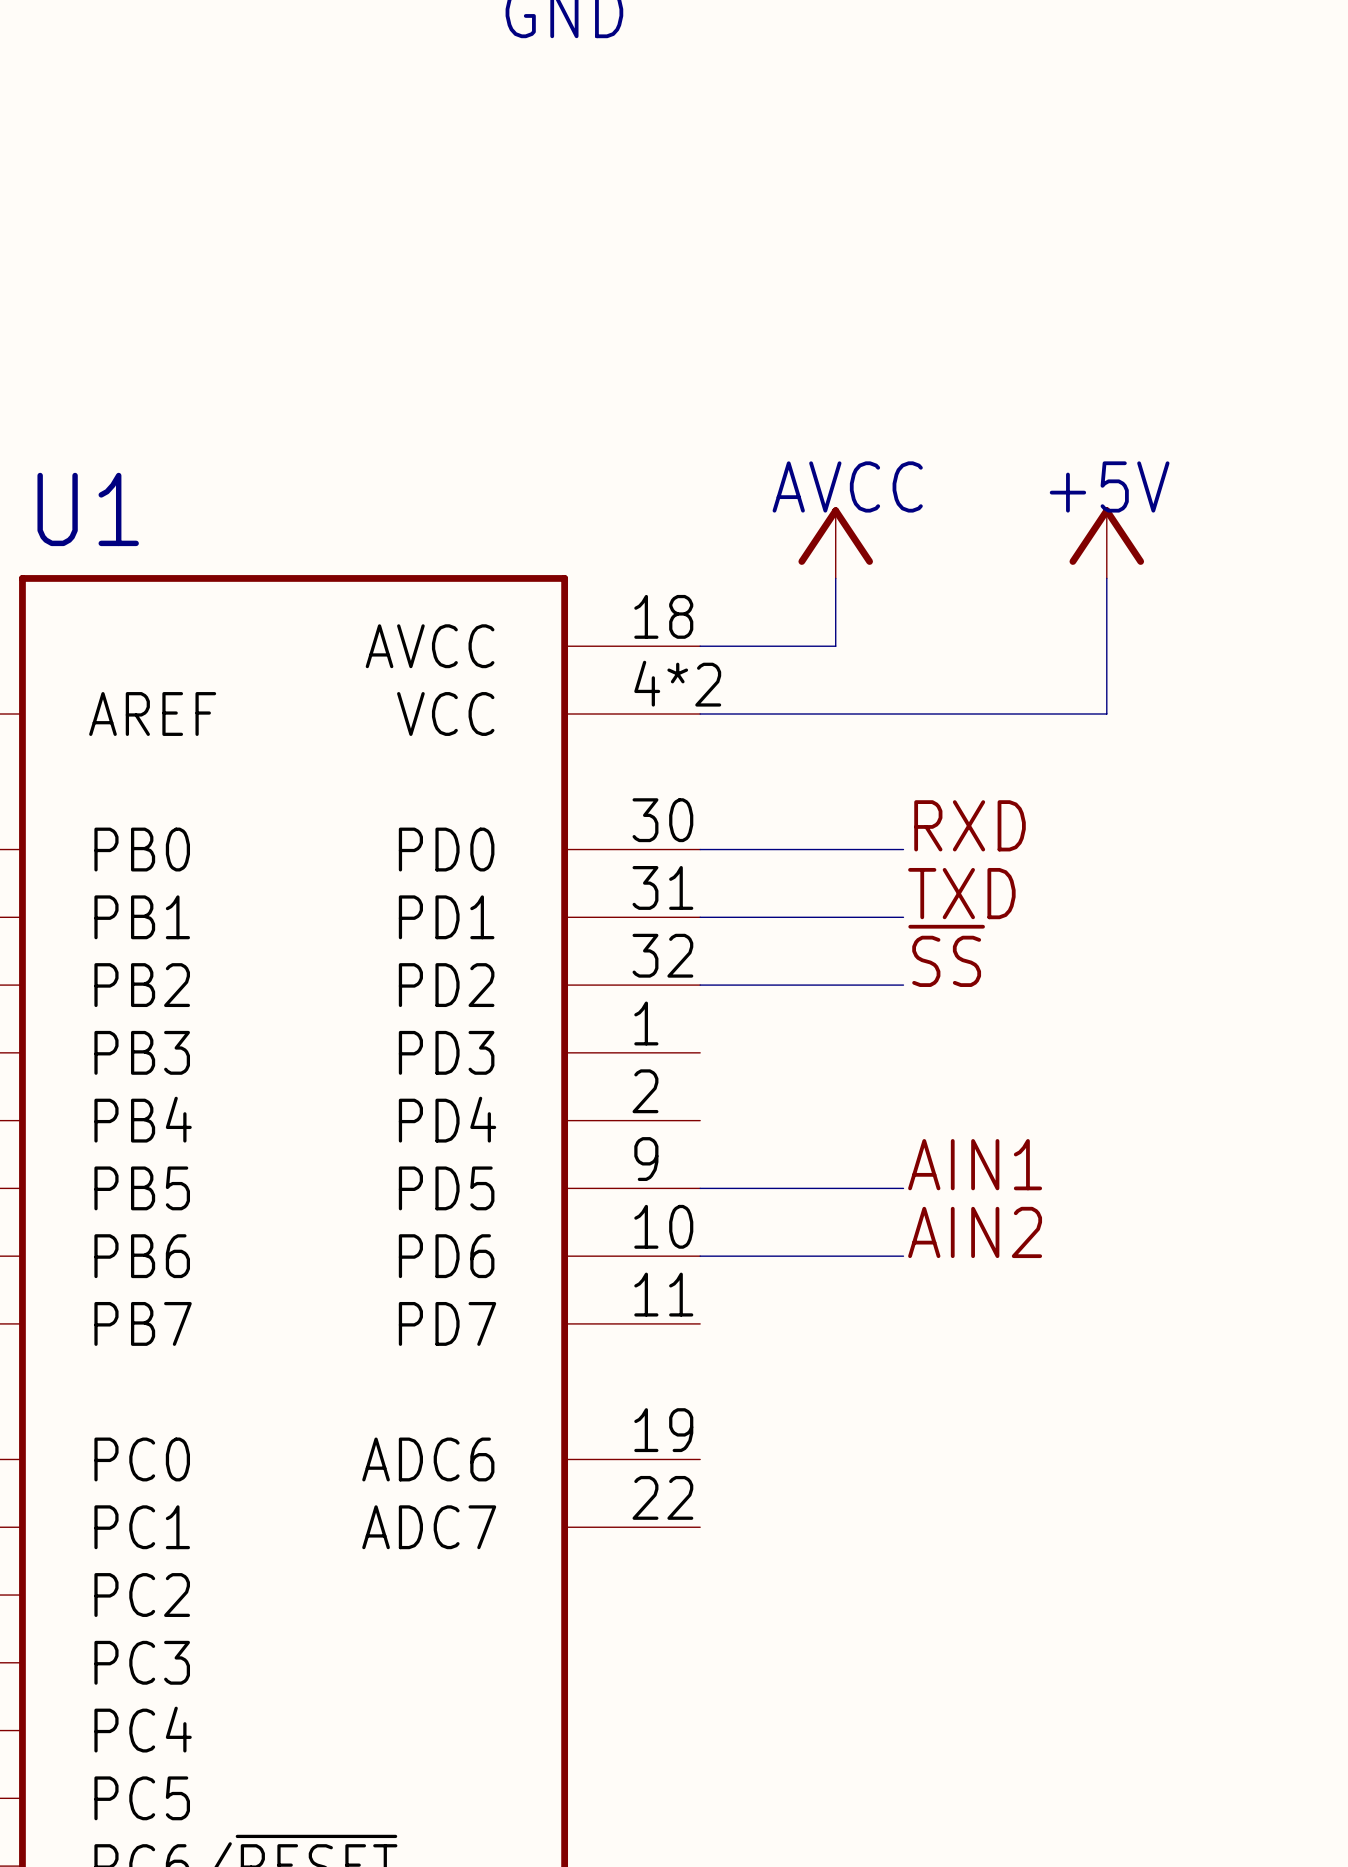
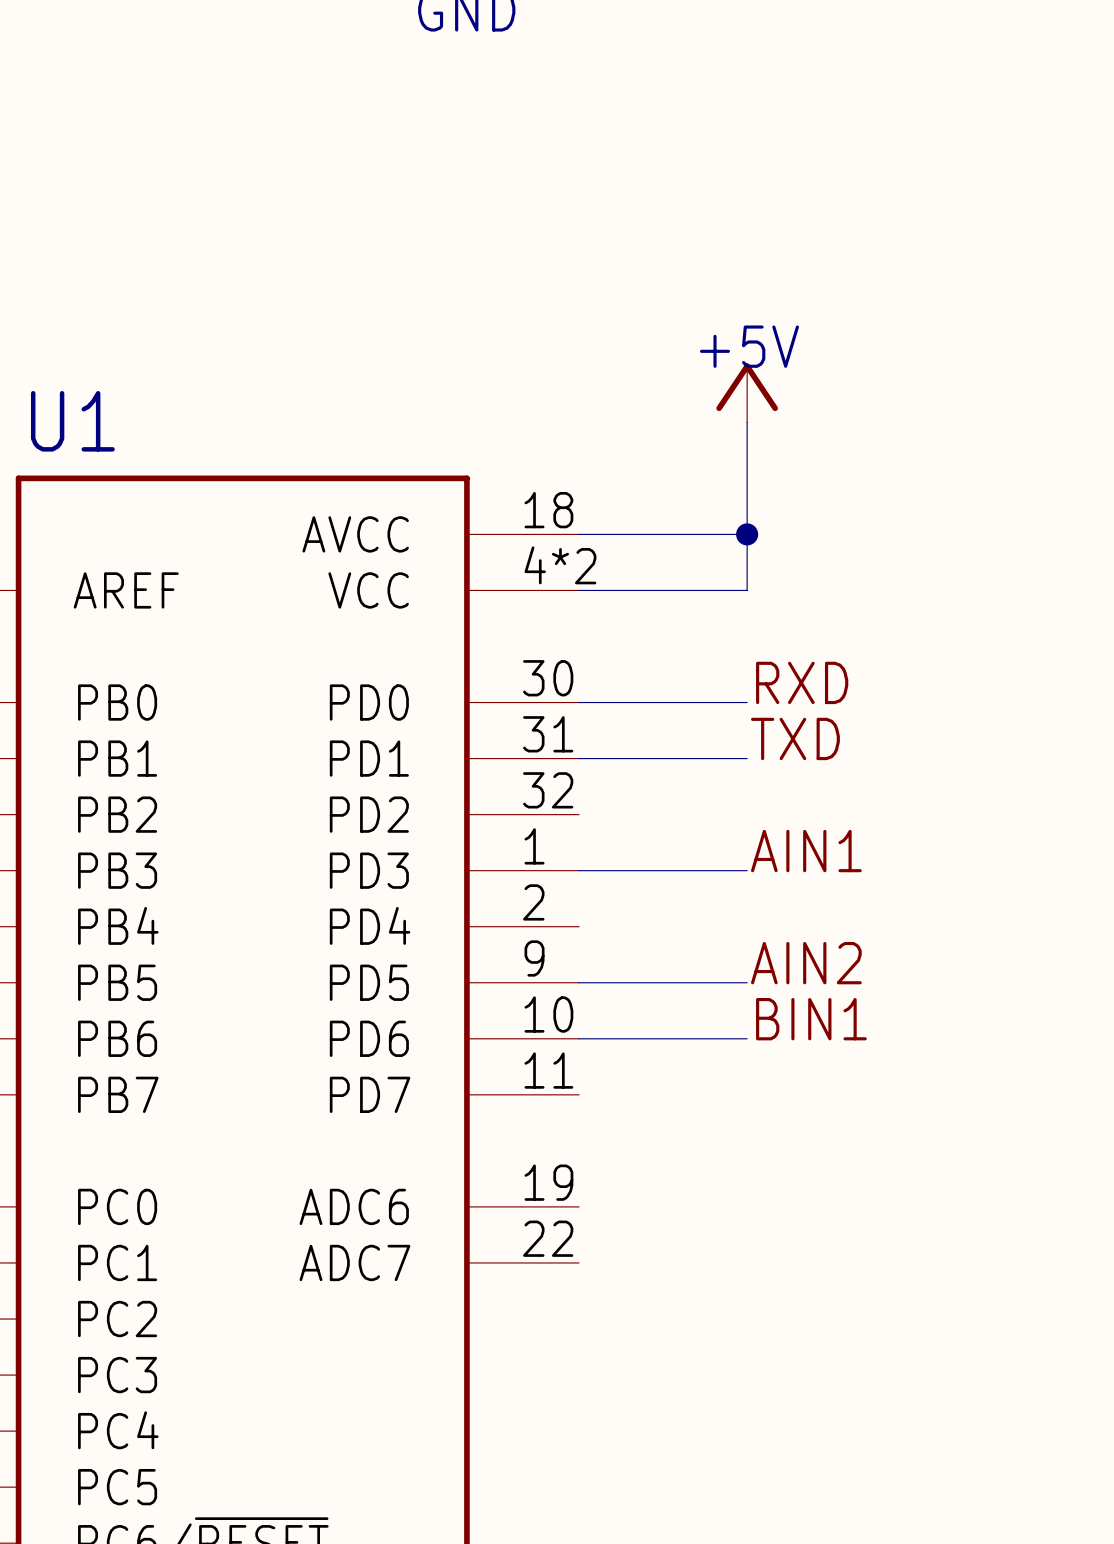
power symbol: AVCC (835, 542) -> none
power symbol position: +5V (1106, 542) -> +5V (747, 392)
wire: (835, 578) (835, 646) -> (747, 534) (691, 534)
wire: (1106, 578) (1106, 713) (903, 713) -> (747, 422) (747, 590)
junction: none -> (747, 534)
label: ~{SS} (946, 955) -> none
wire: (700, 985) (903, 985) -> (579, 870) (747, 870)
label: none -> AIN1 (806, 851)
label: AIN1 (975, 1164) -> AIN2 (806, 963)
label: AIN2 (975, 1232) -> BIN1 (811, 1019)

